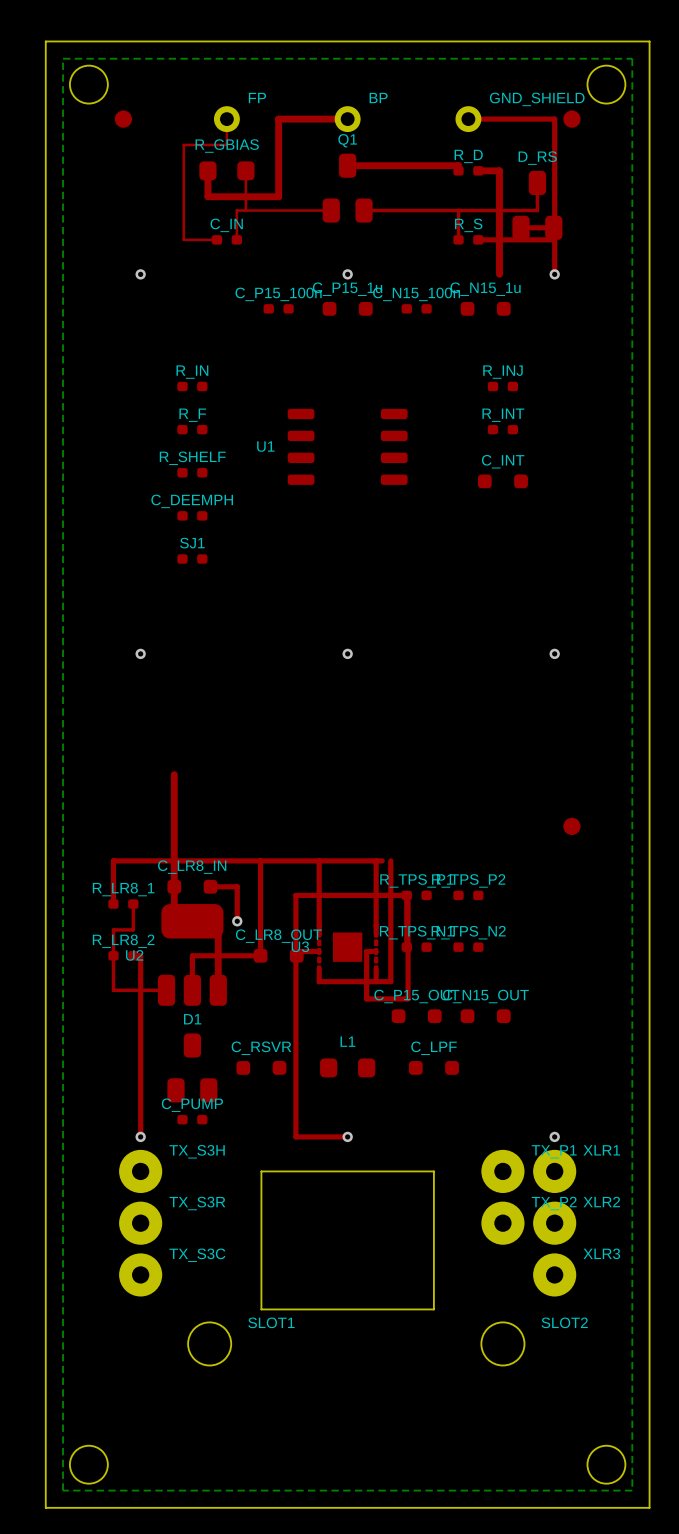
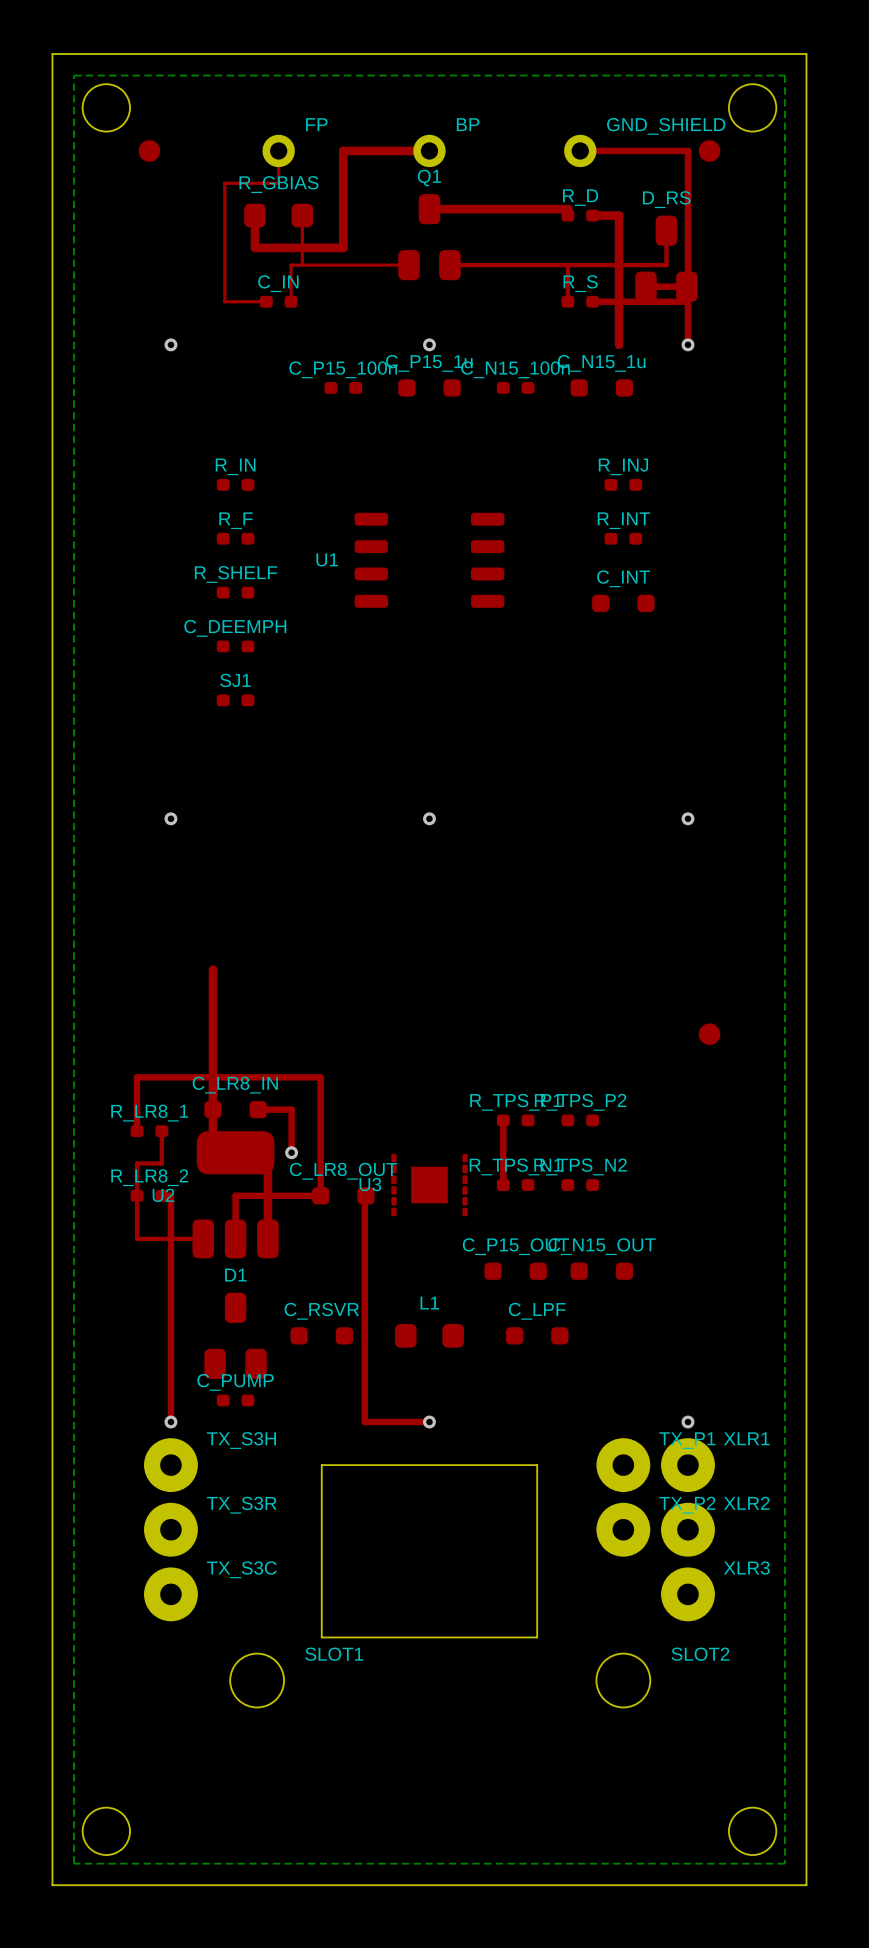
top track: (260, 860) (382, 860) -> none
top track: (319, 860) (319, 934) -> none
top track: (376, 860) (376, 934) -> none
top track: (390, 860) (390, 981) (319, 981) (319, 968) -> none
top track: (319, 951) (295, 951) (295, 895) (408, 895) (408, 998) (366, 998) (366, 951) (376, 951) -> none
top track: (376, 968) (376, 981) -> none

